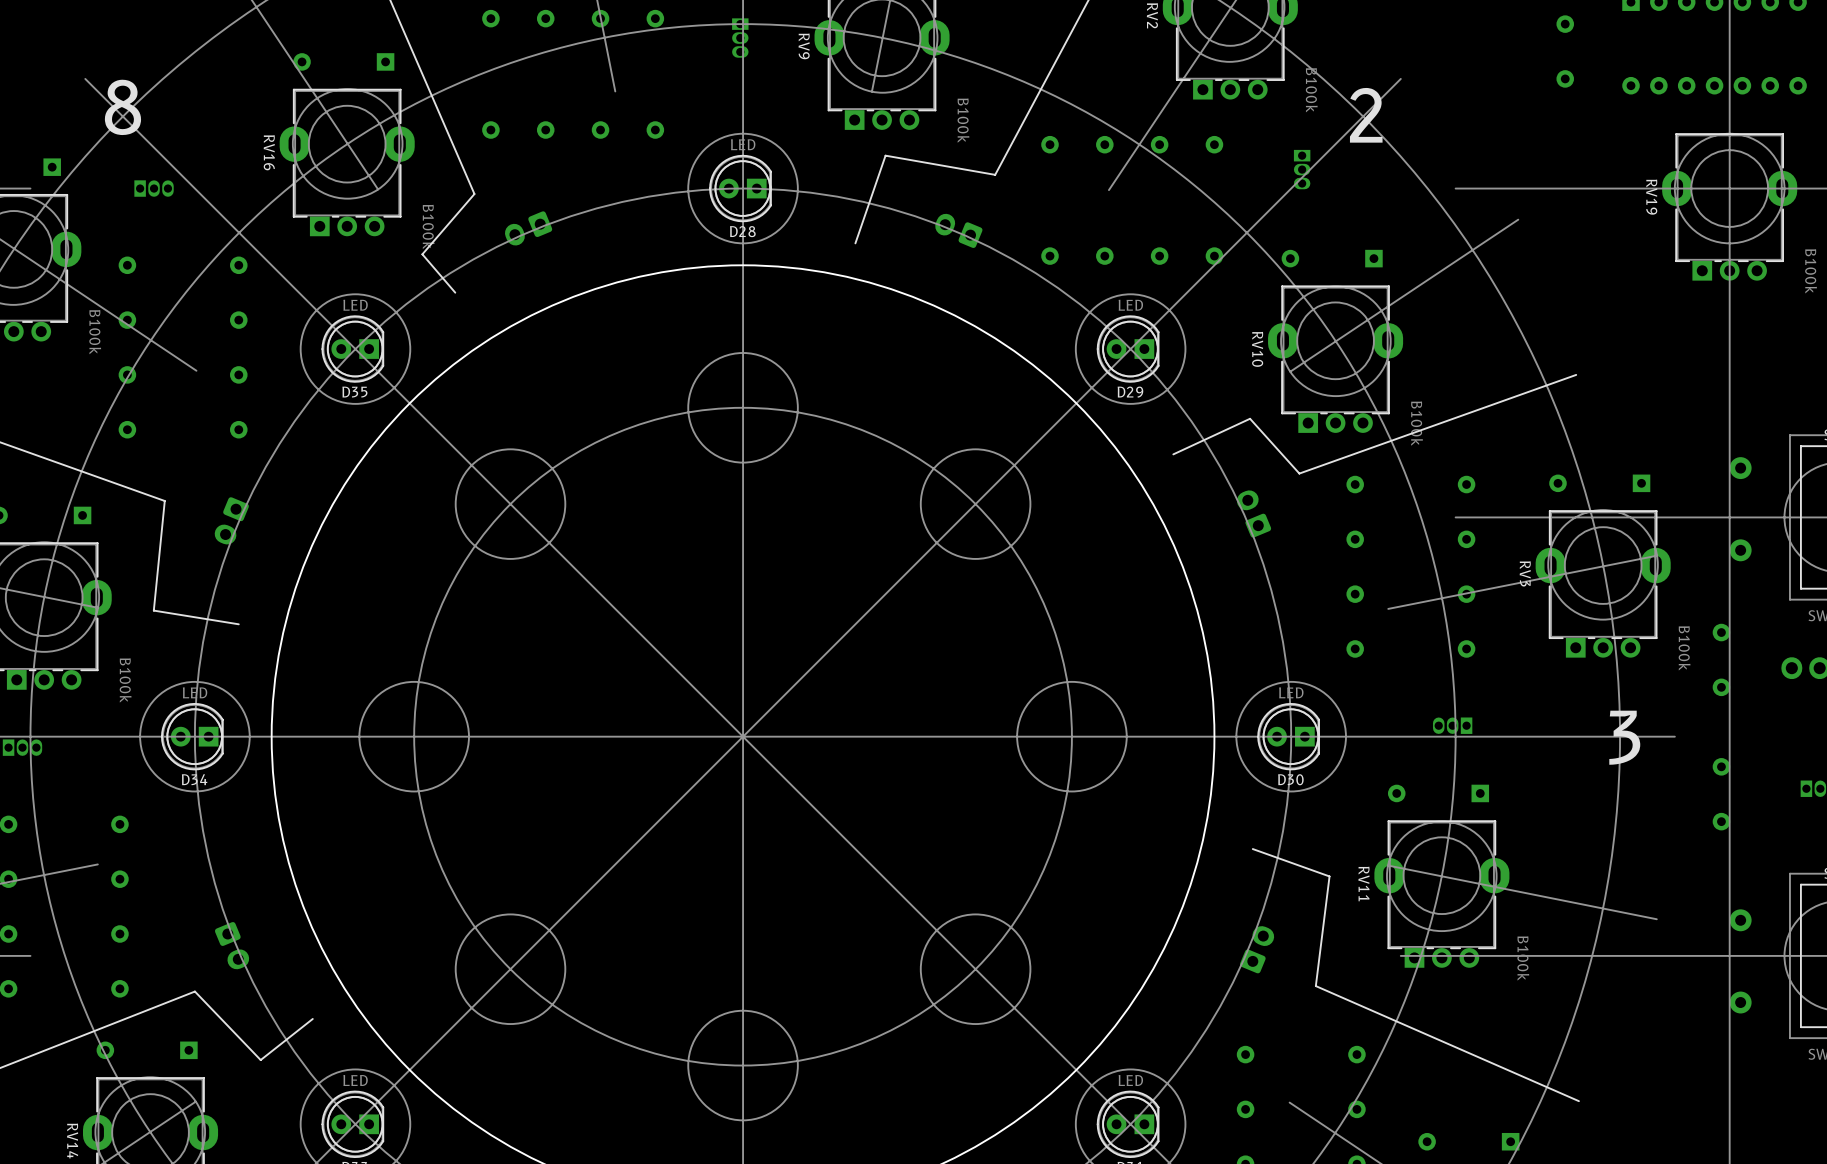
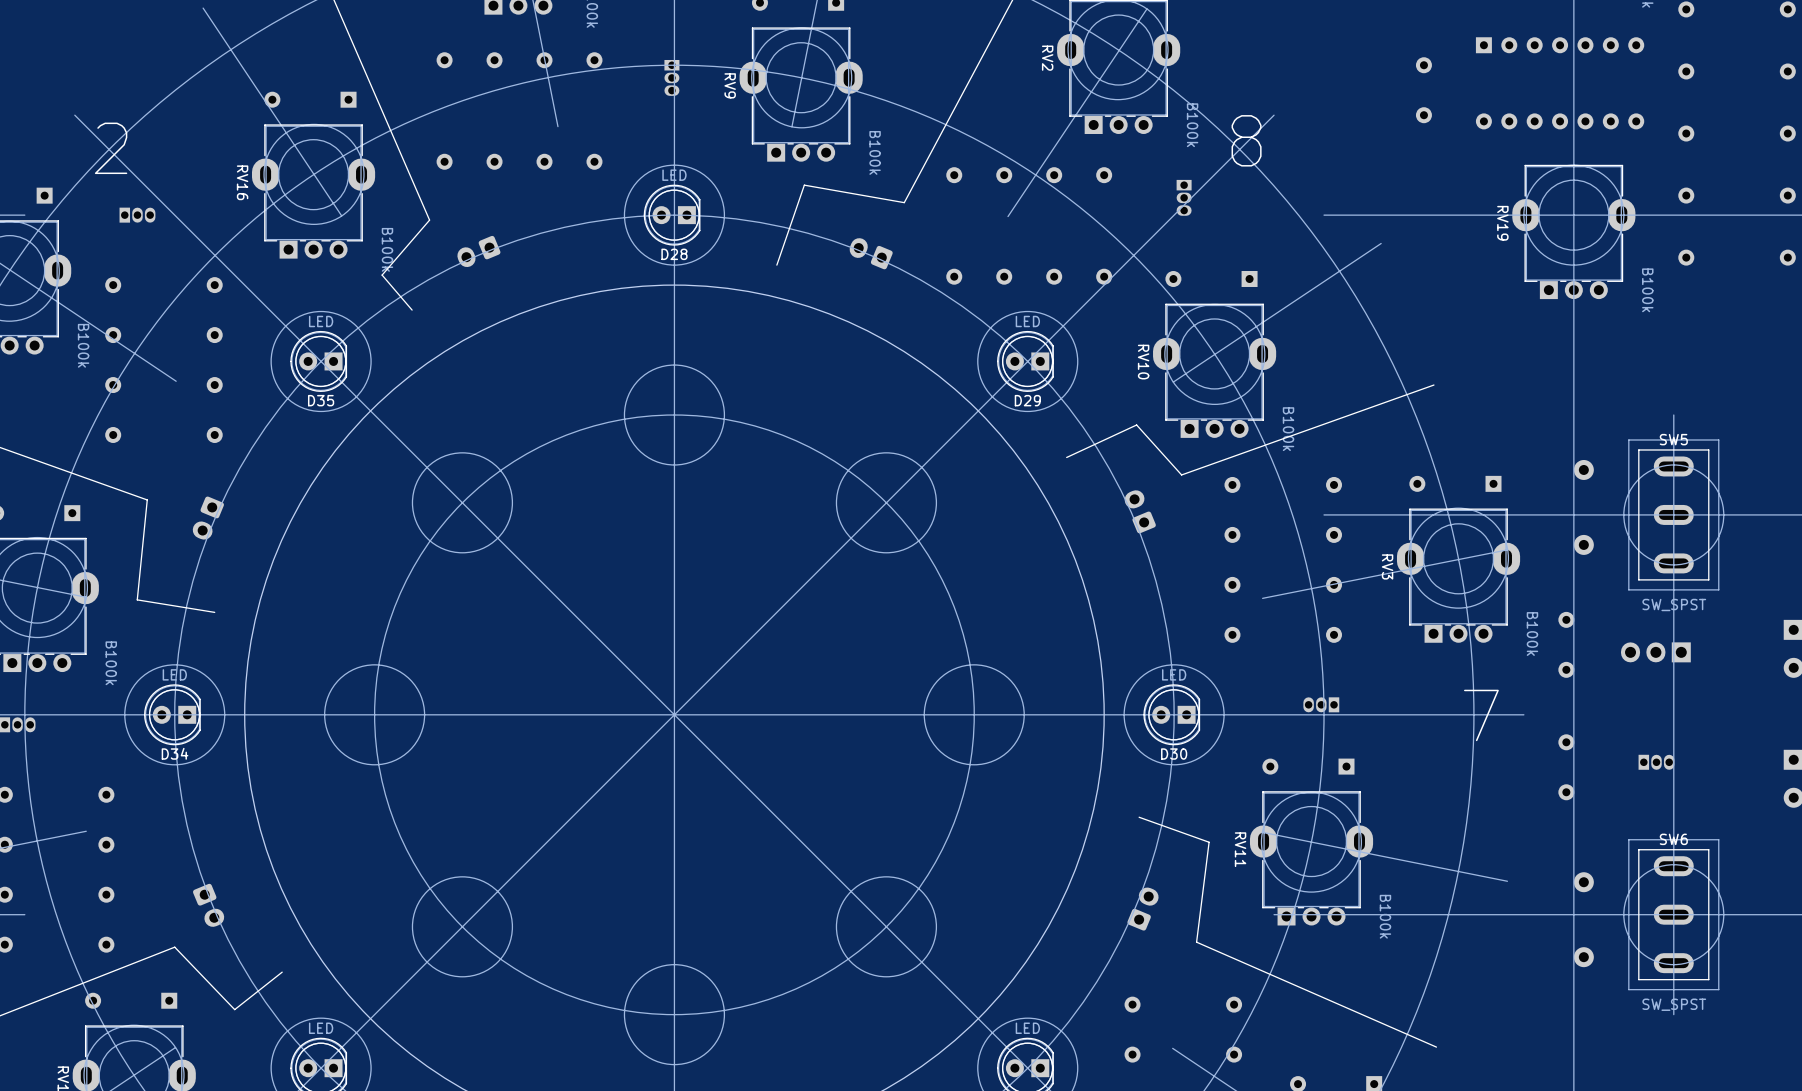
text: 8 (122, 107) -> 2 (111, 148)
text: 2 (1366, 115) -> 8 (1246, 140)
text: 3 (1624, 737) -> 7 (1481, 715)

